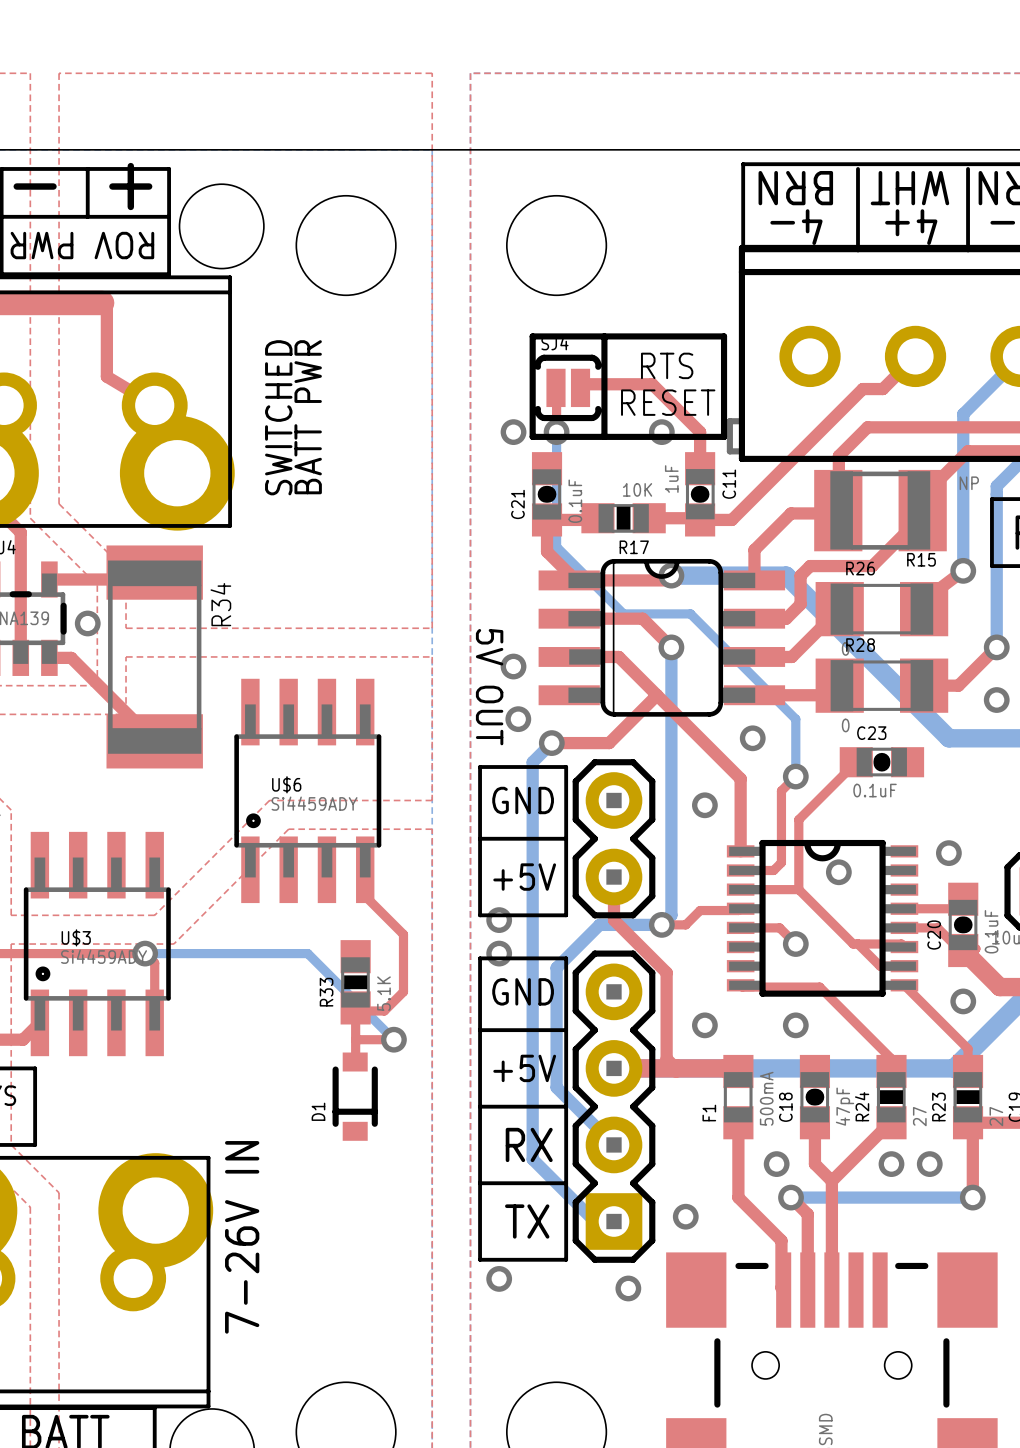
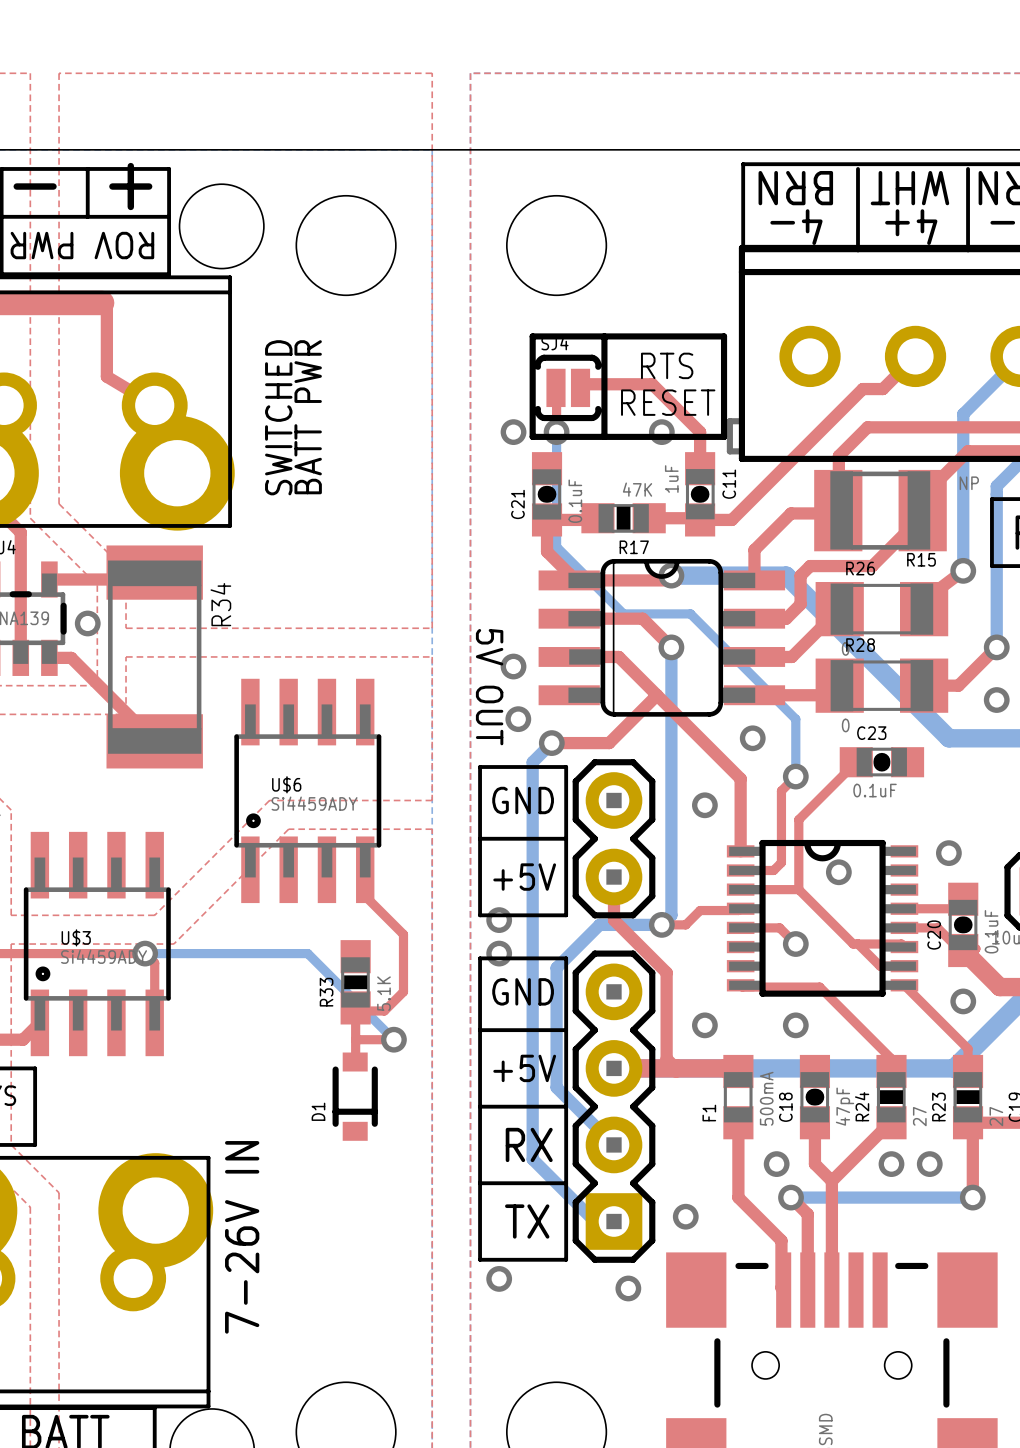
R17 value: 10K (637, 489) -> 47K (637, 489)

